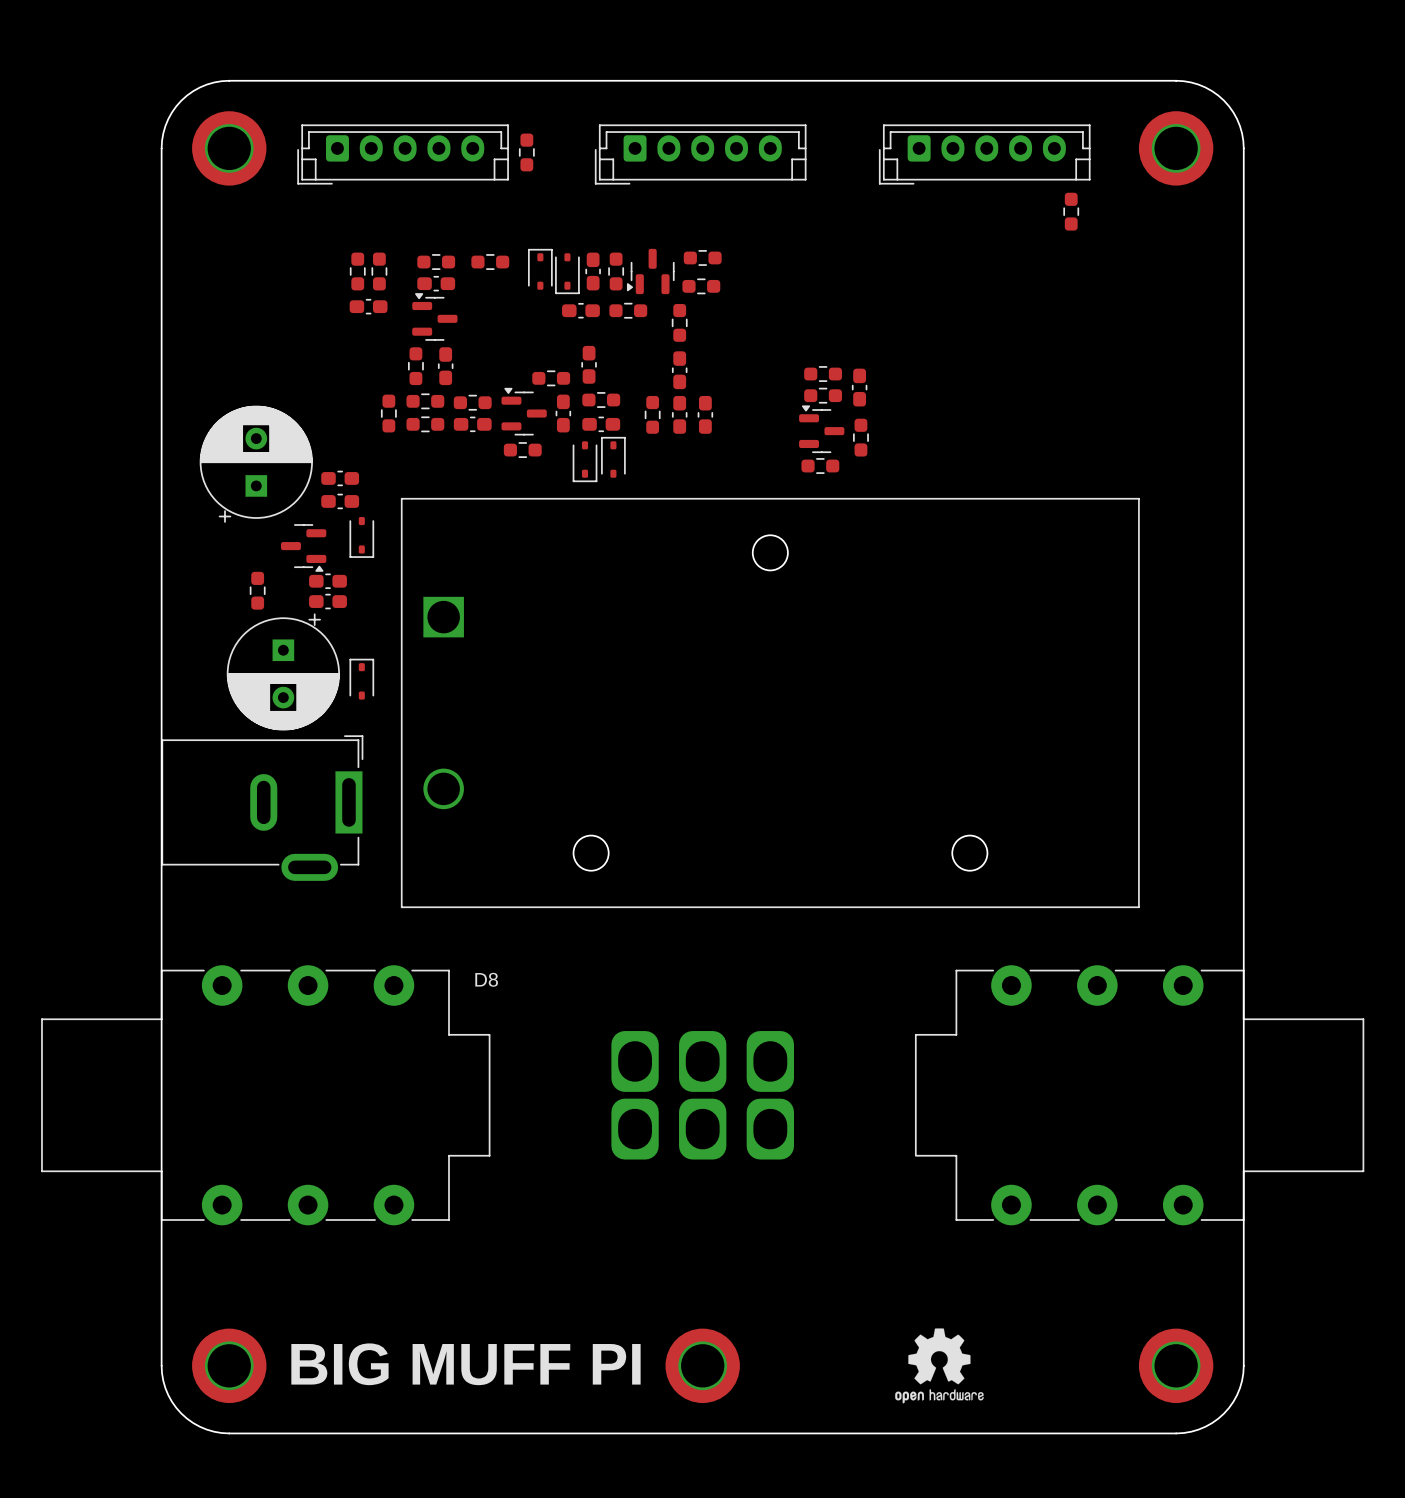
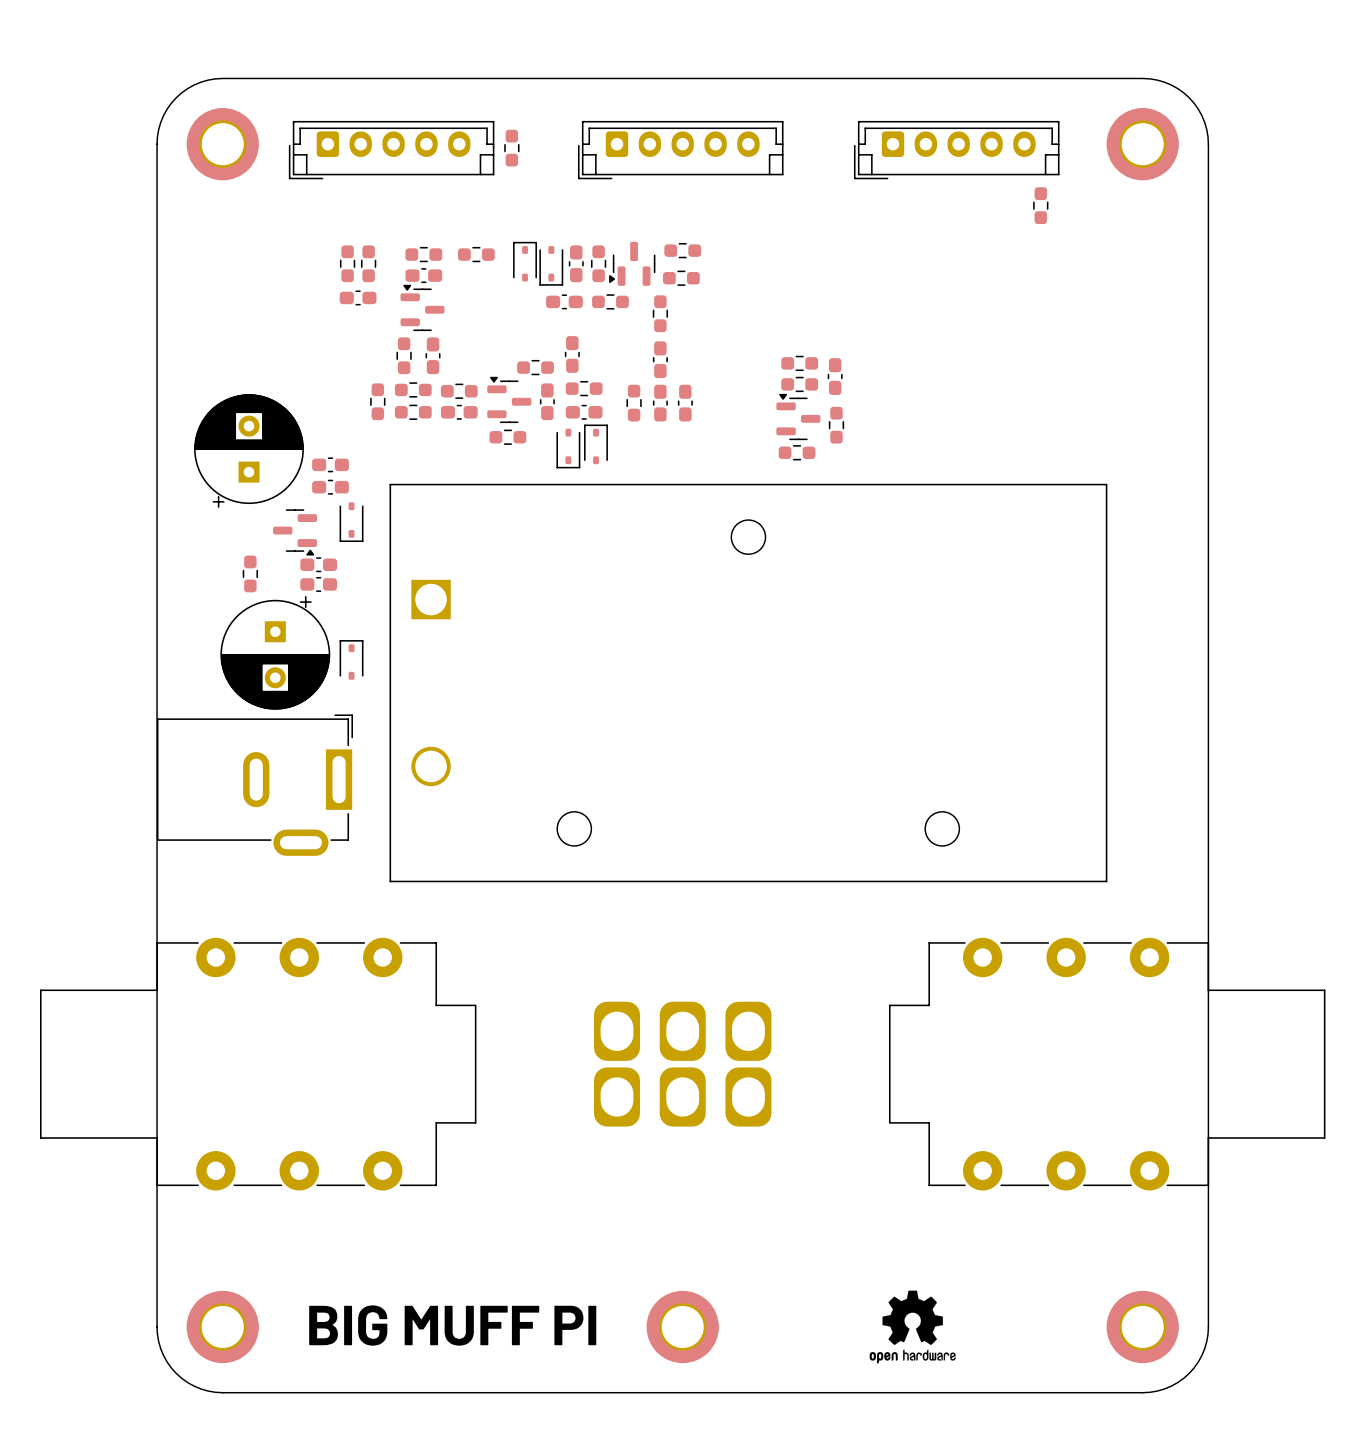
D8: (486, 979) -> none

